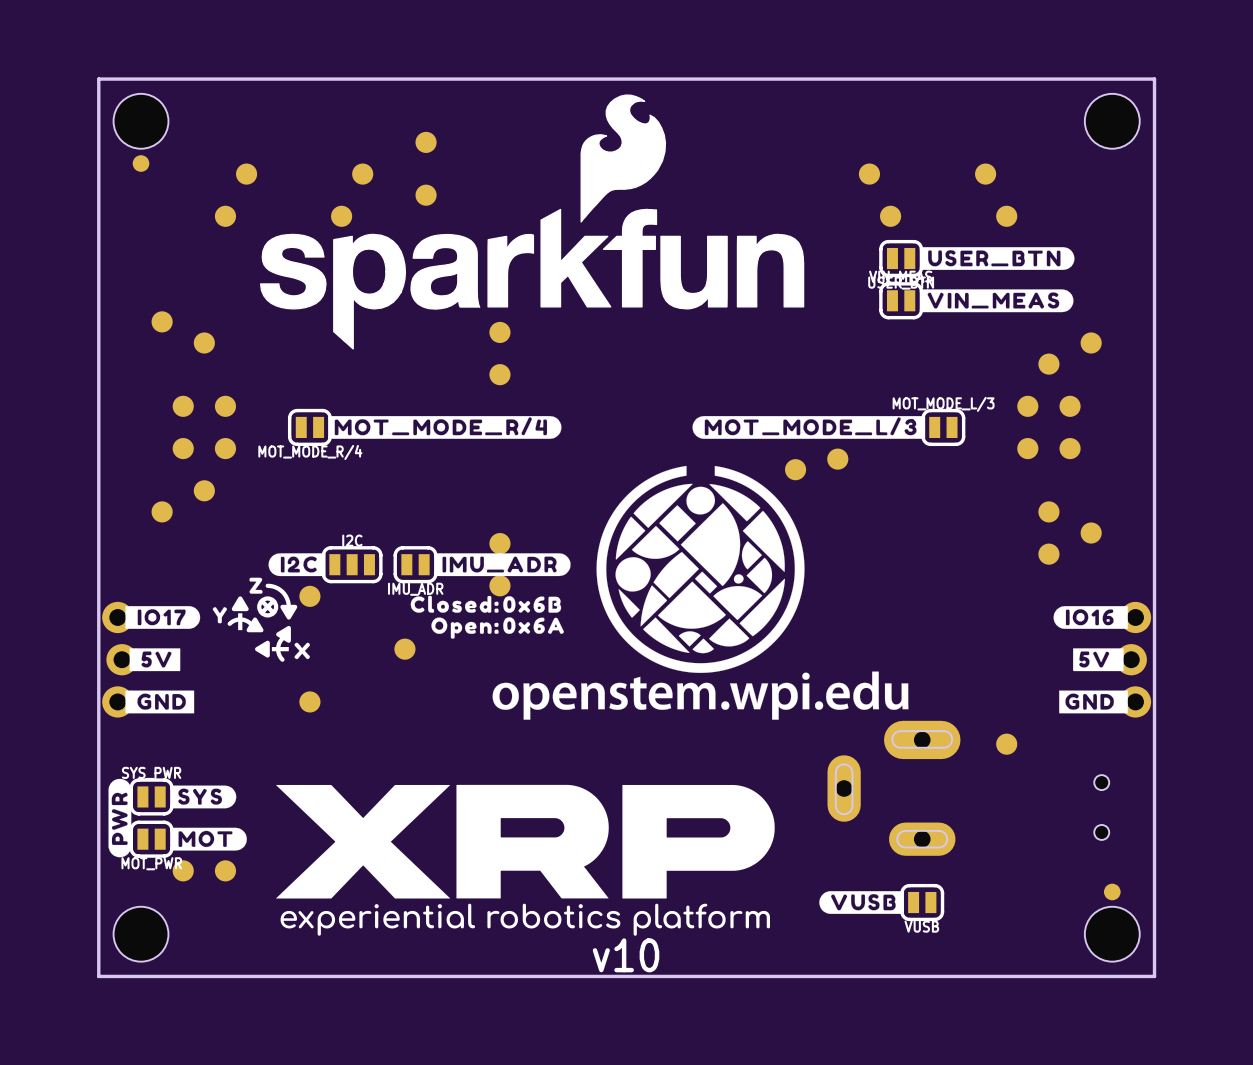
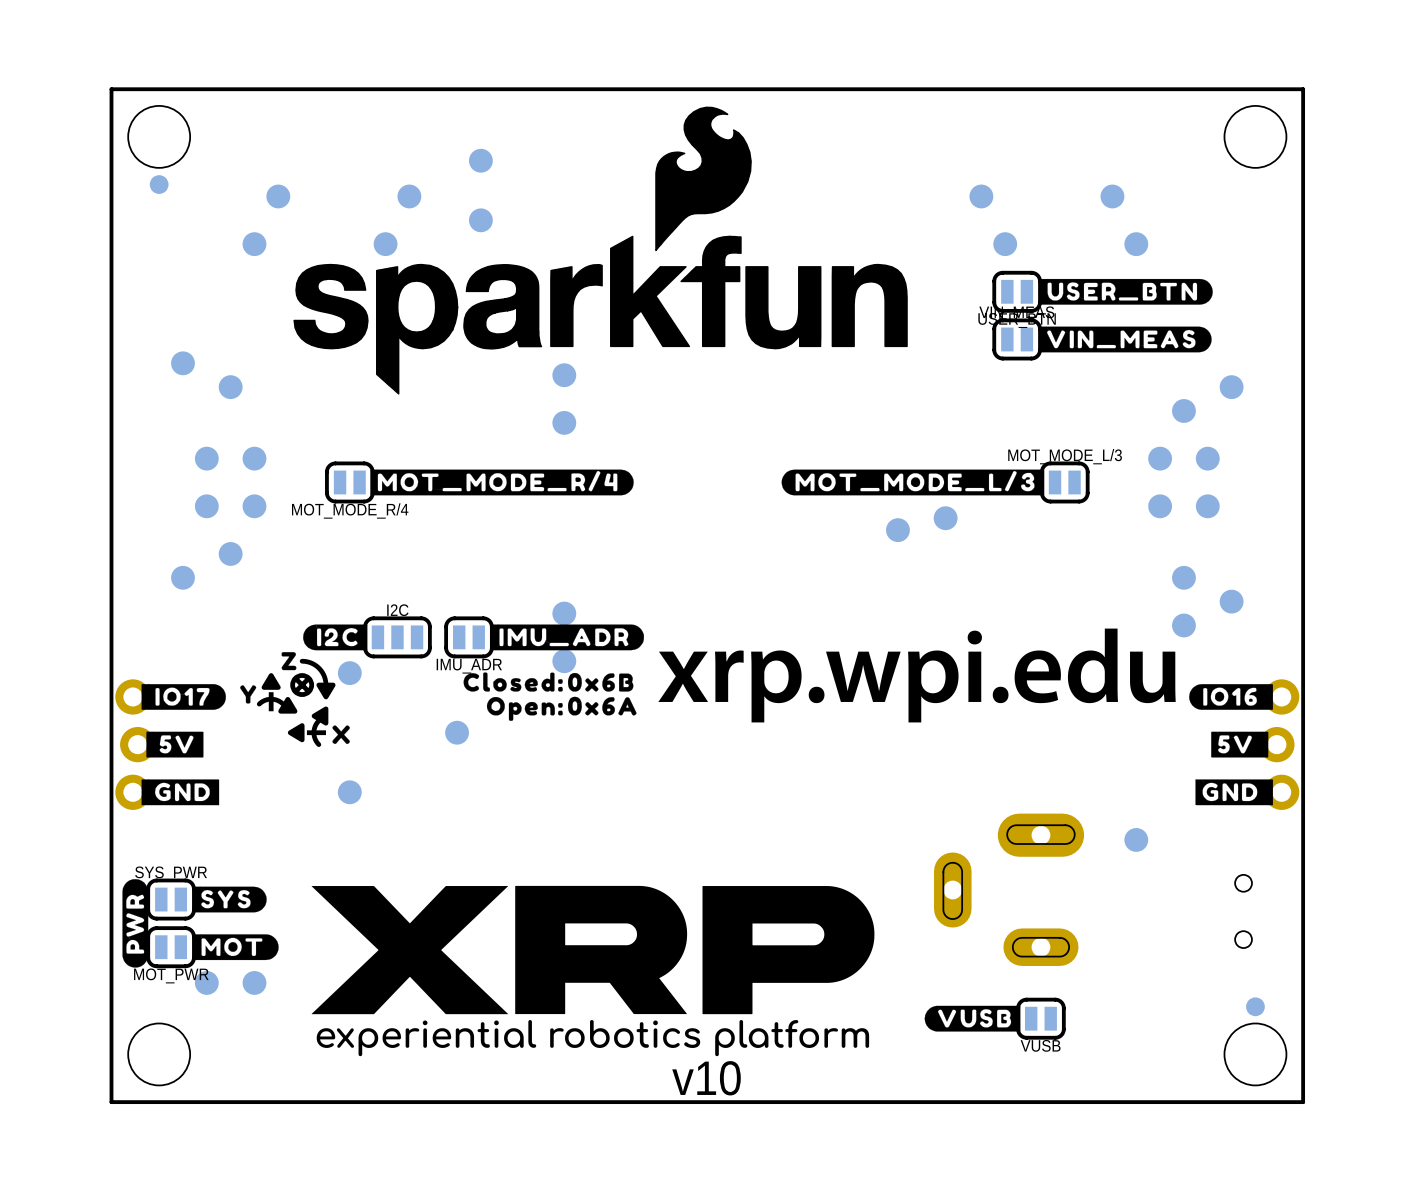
drawing: [492, 465, 909, 720] -> none
drawing: none -> [658, 628, 1176, 723]

